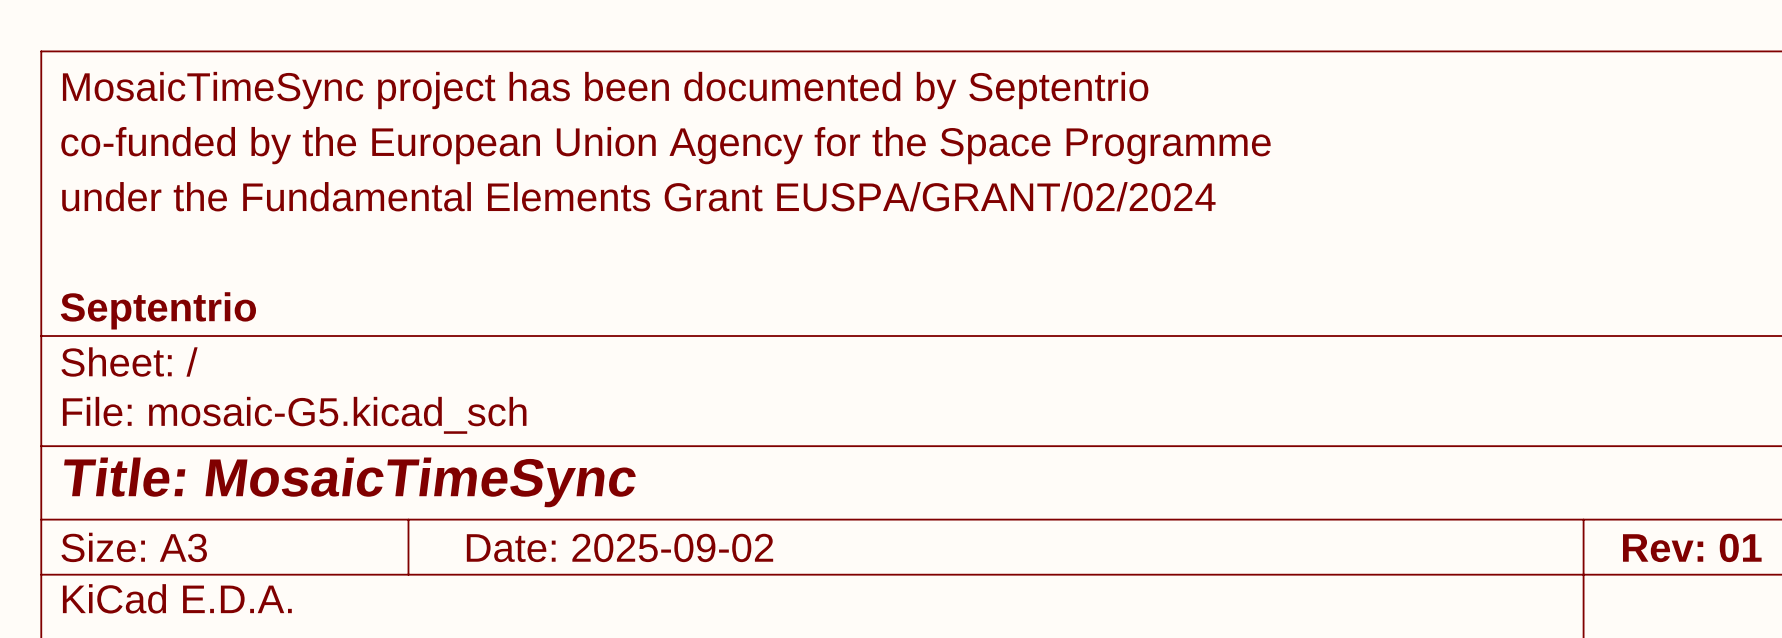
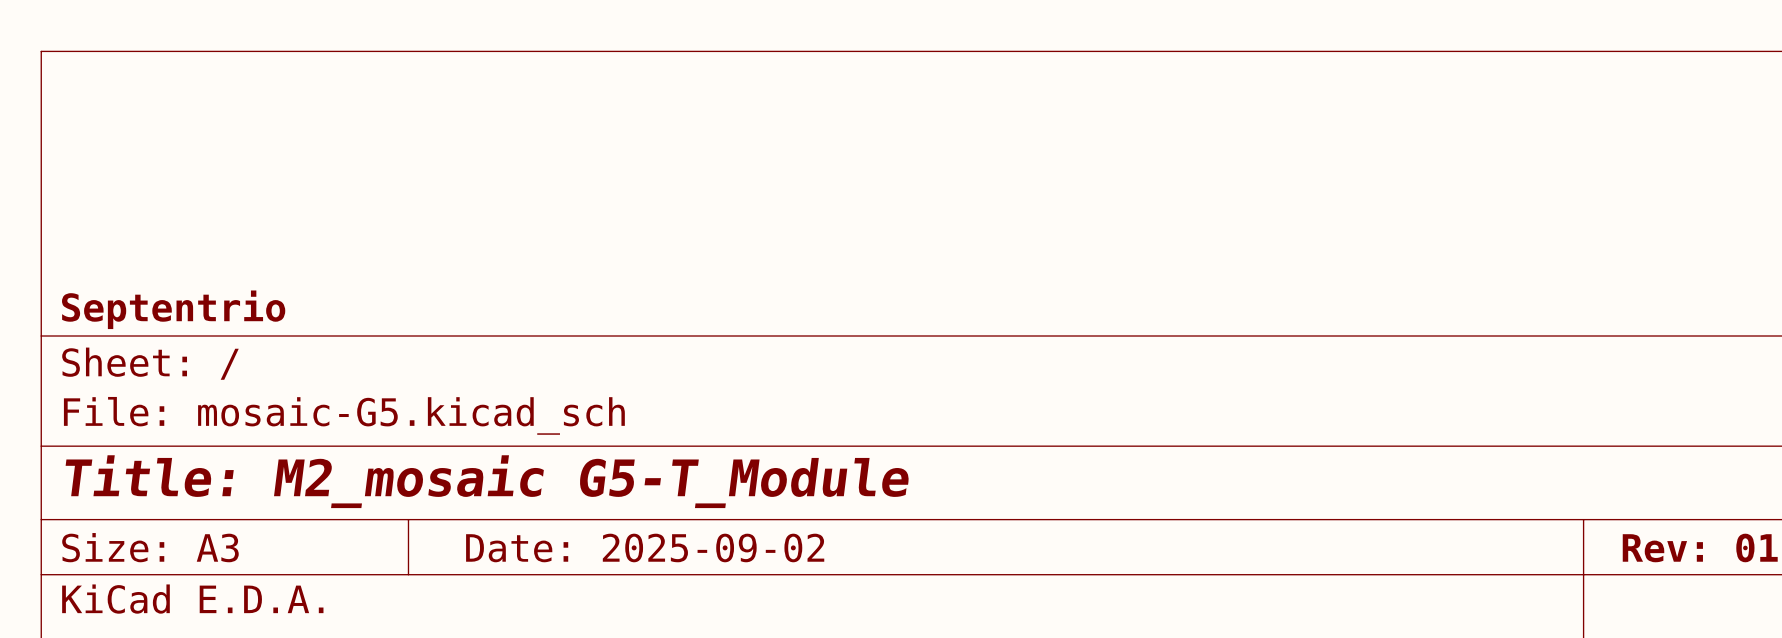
title block: MosaicTimeSync project has been documented by Septentrio (605, 90) -> none
title block: co-funded by the European Union Agency for the Space Programme (666, 145) -> none
title block: under the Fundamental Elements Grant EUSPA/GRANT/02/2024 (638, 196) -> none
title block: Title: MosaicTimeSync (349, 482) -> Title: M2_mosaic G5-T_Module (487, 481)

